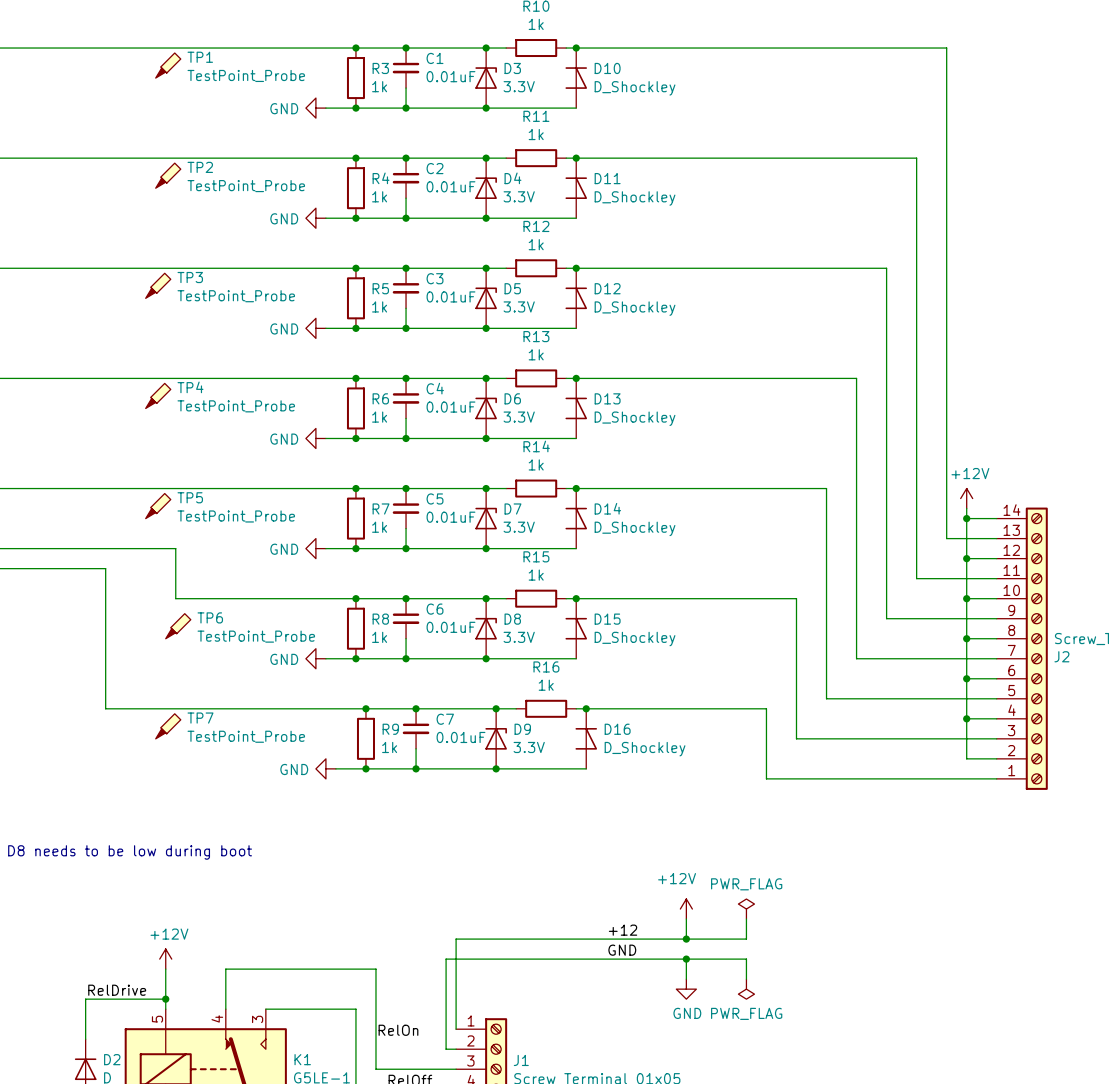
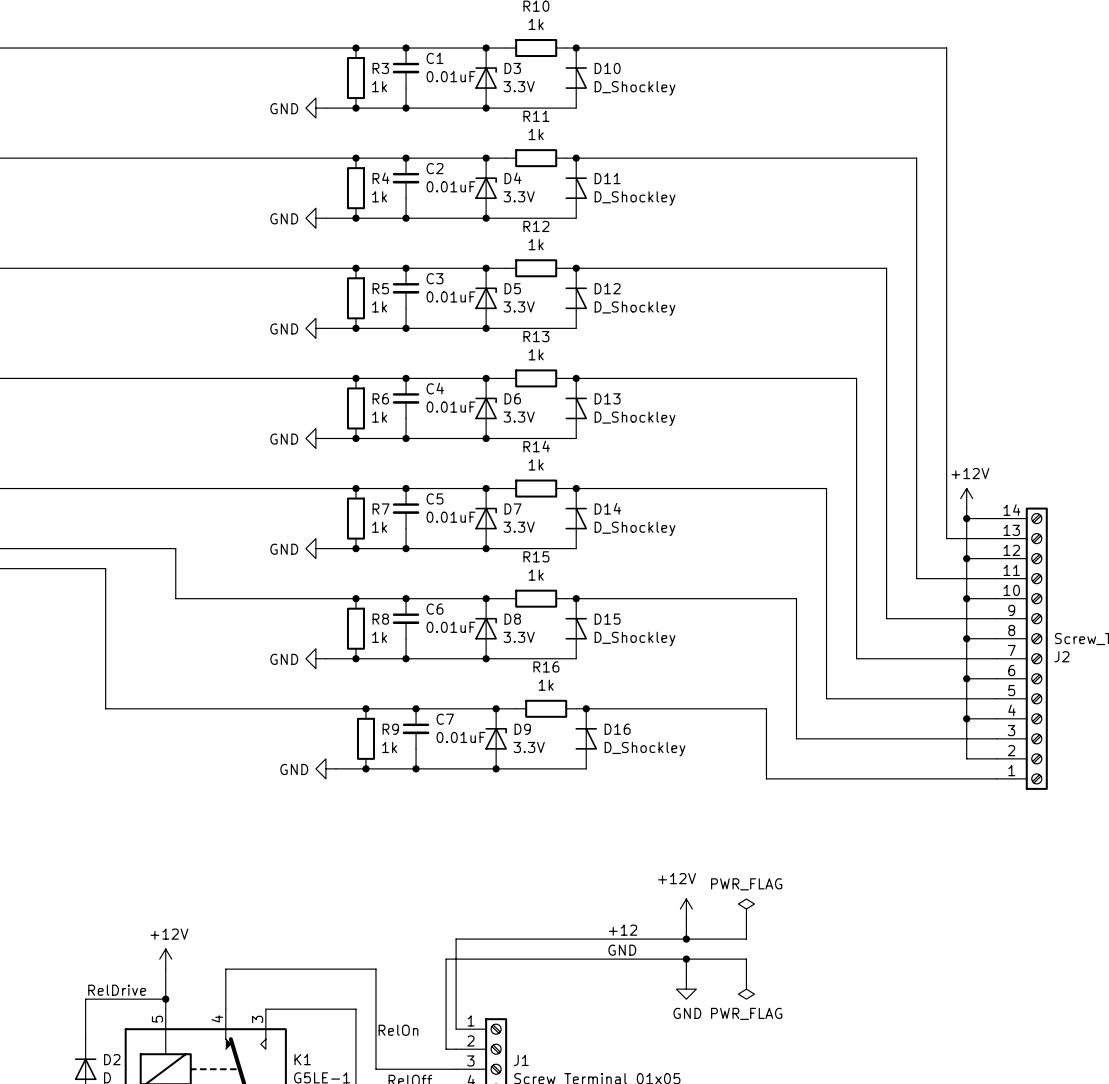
TP1: TestPoint_Probe (168, 65) -> none
TP2: TestPoint_Probe (168, 175) -> none
TP3: TestPoint_Probe (158, 285) -> none
TP4: TestPoint_Probe (158, 395) -> none
TP5: TestPoint_Probe (158, 506) -> none
TP6: TestPoint_Probe (178, 626) -> none
TP7: TestPoint_Probe (168, 726) -> none
text: D8 needs to be low during boot (130, 852) -> none

